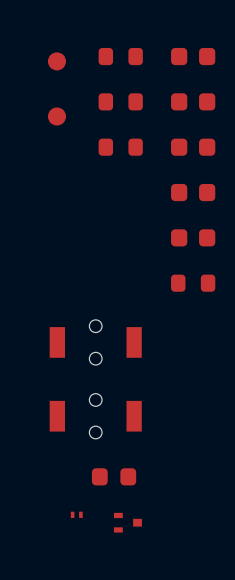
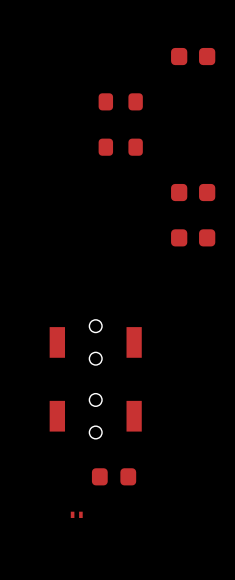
part: (120, 56) -> none
part: (56, 61) -> none
part: (193, 101) -> none
part: (56, 116) -> none
part: (193, 147) -> none
part: (193, 283) -> none
part: (127, 522) -> none

